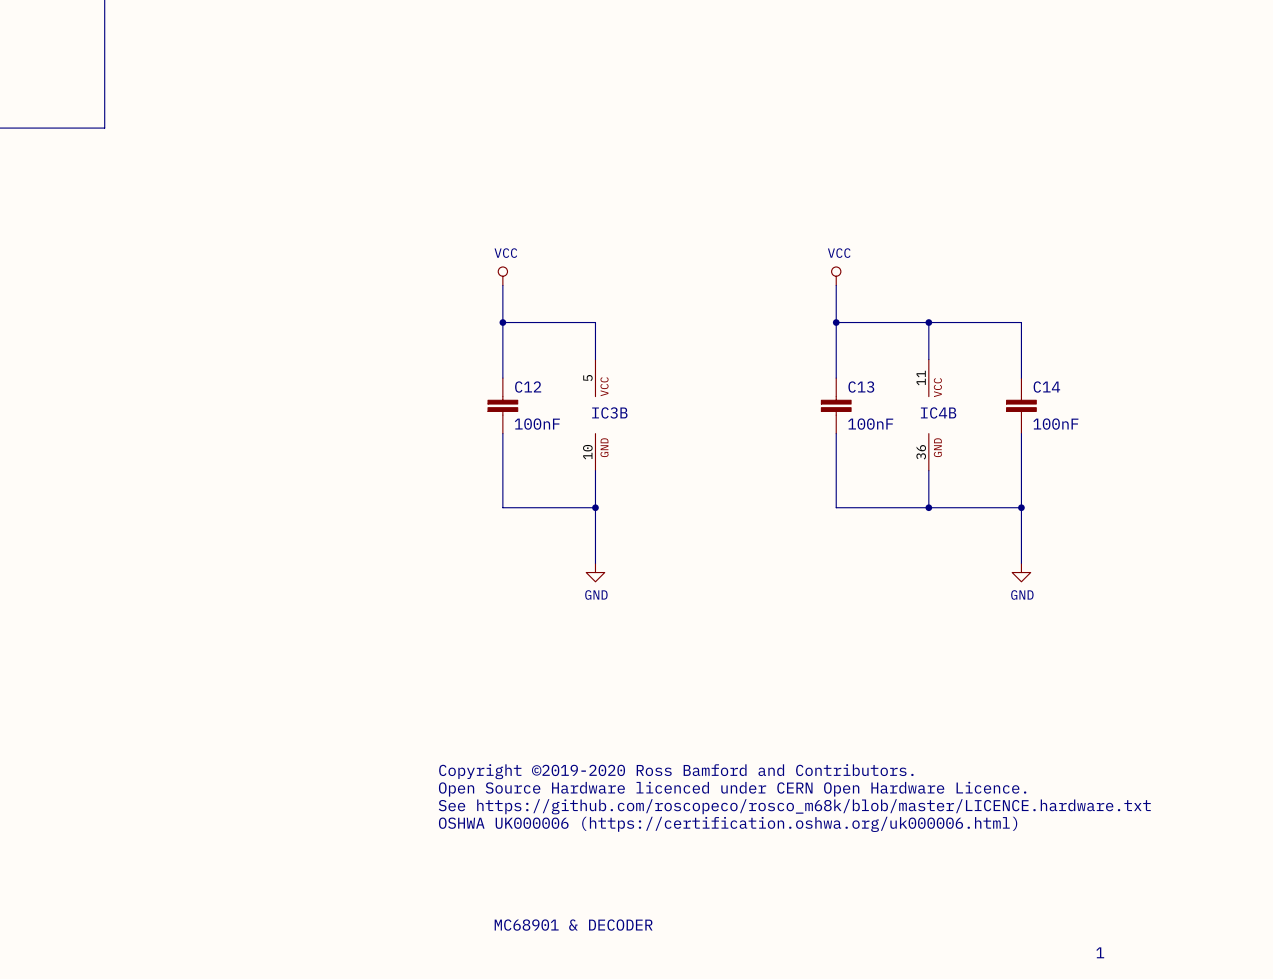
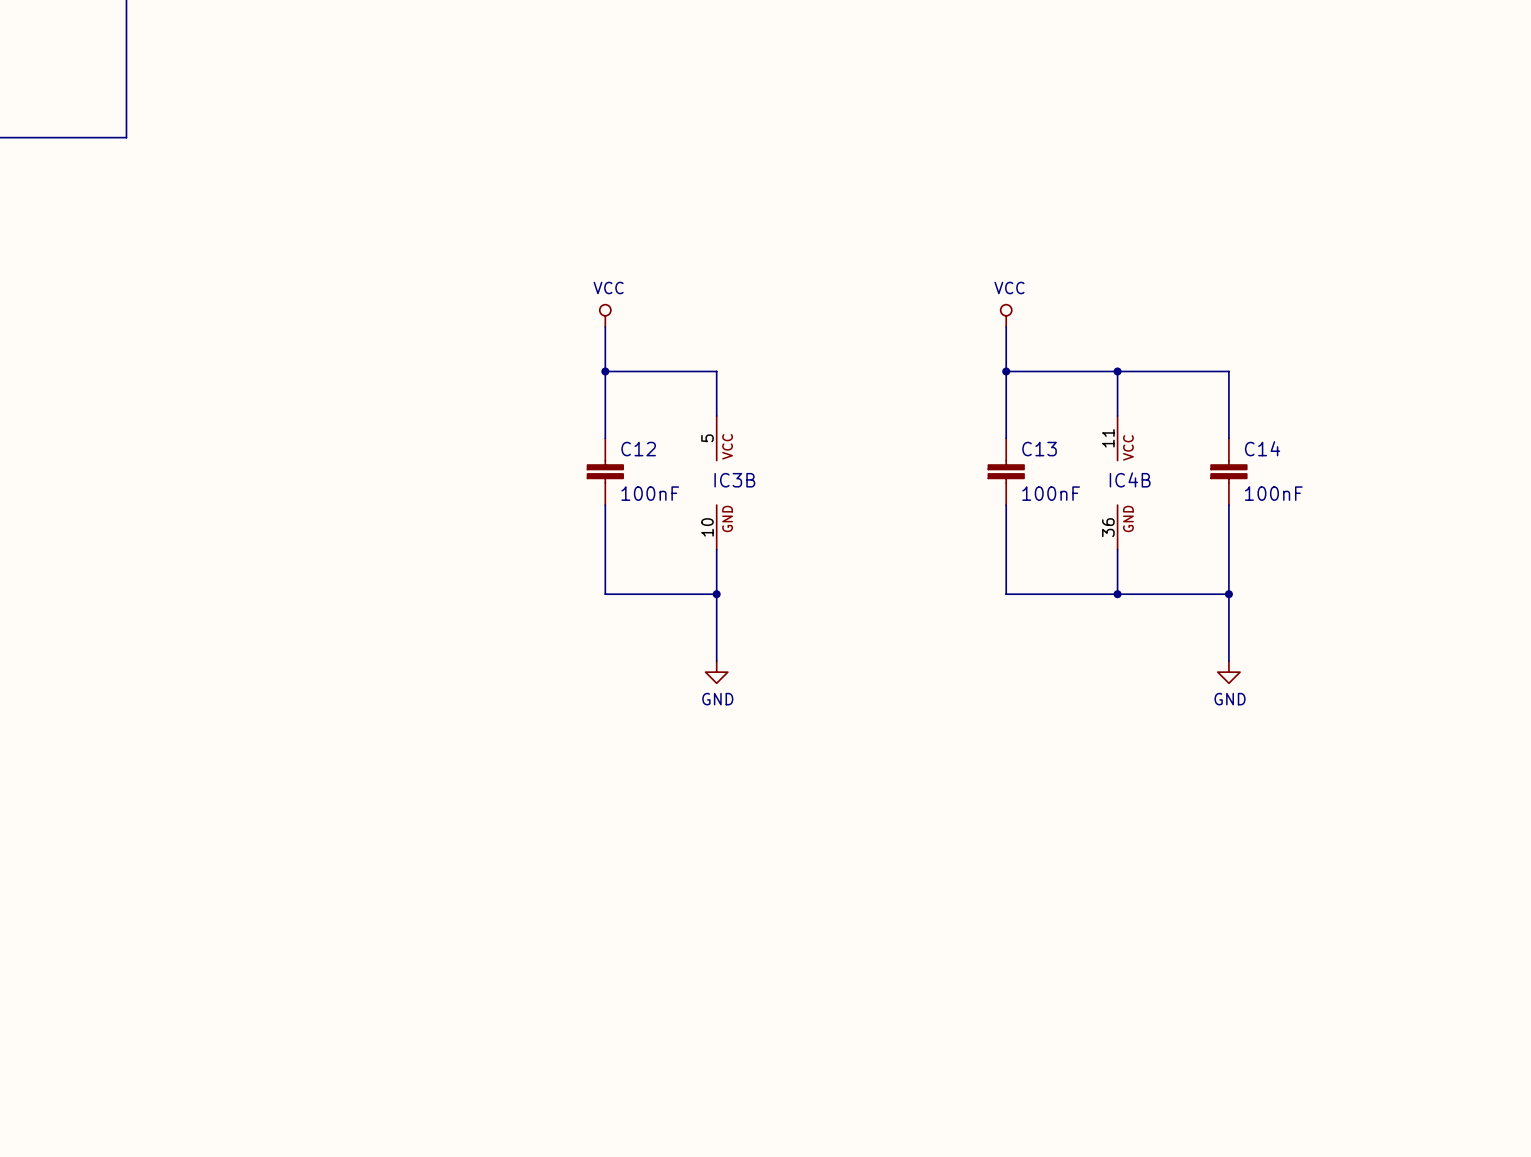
text: Copyright ©2019-2020 Ross Bamford and Contributors. (676, 771) -> none
text: Open Source Hardware licenced under CERN Open Hardware Licence. (732, 789) -> none
text: See https://github.com/roscopeco/rosco_m68k/blob/master/LICENCE.hardware.txt (794, 806) -> none
text: OSHWA UK000006 (https://certification.oshwa.org/uk000006.html) (728, 824) -> none
text: MC68901 & DECODER (573, 925) -> none
text: 1 (1100, 952) -> none

